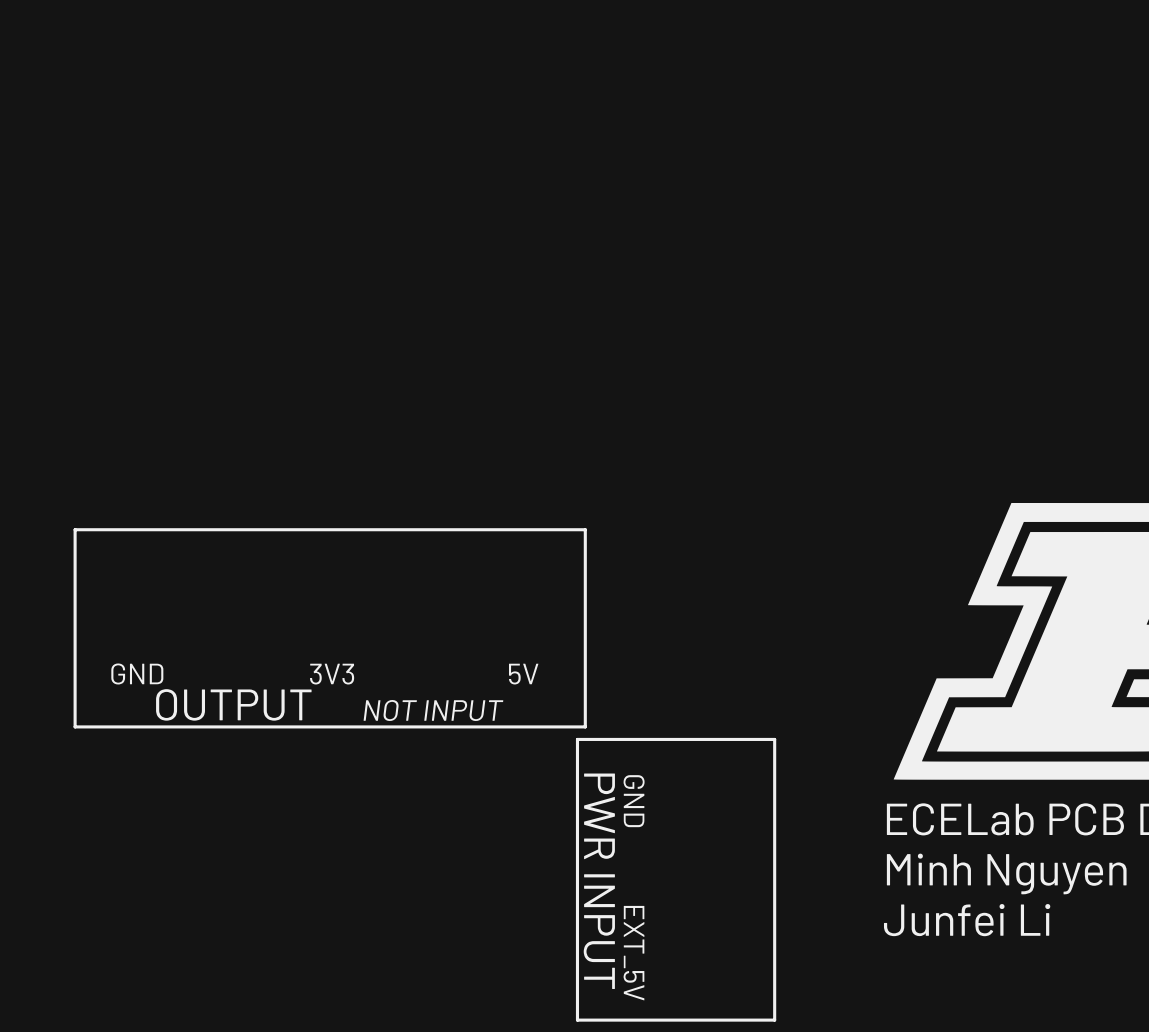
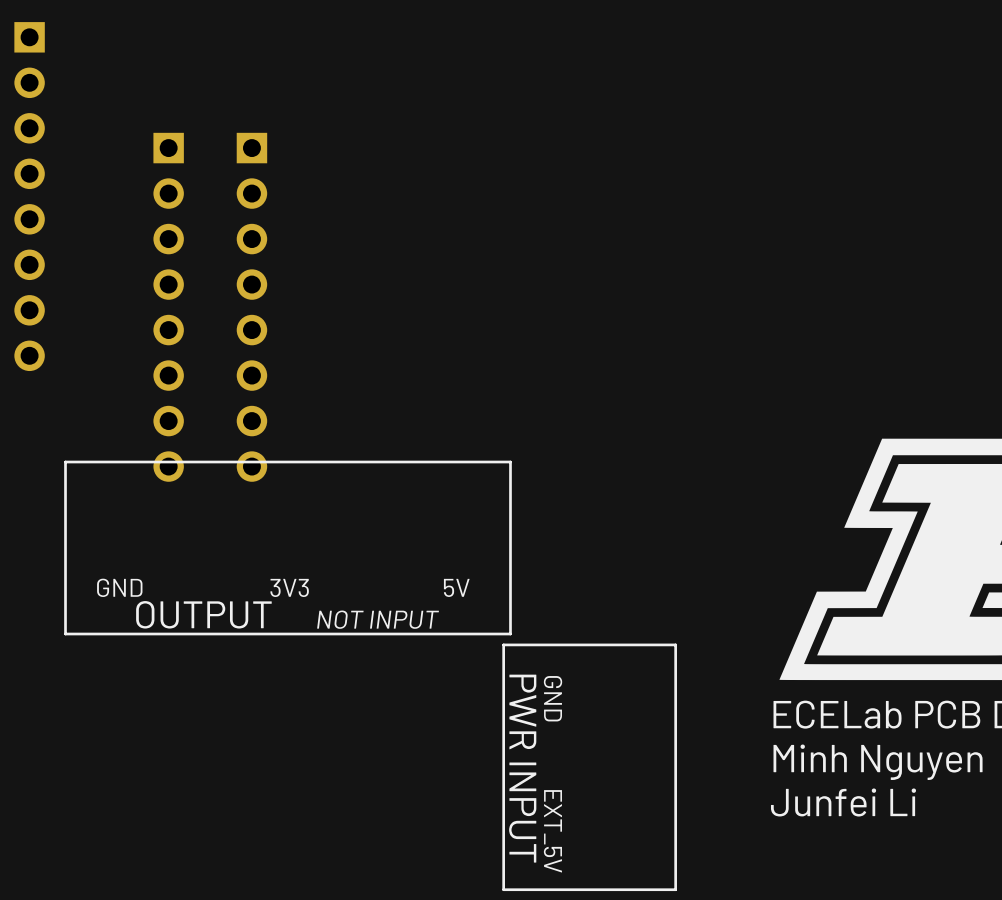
part: none -> (29, 196)
part: none -> (168, 307)
part: none -> (251, 307)

